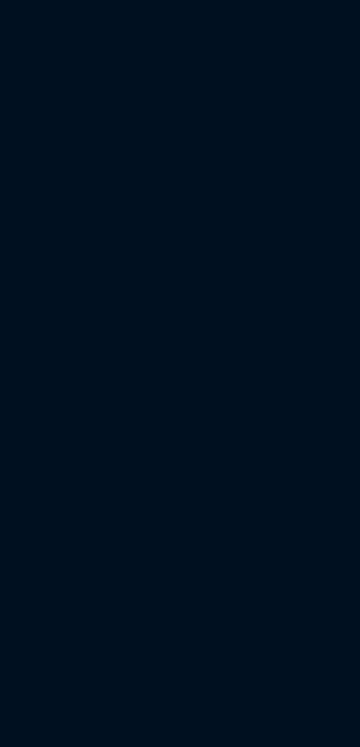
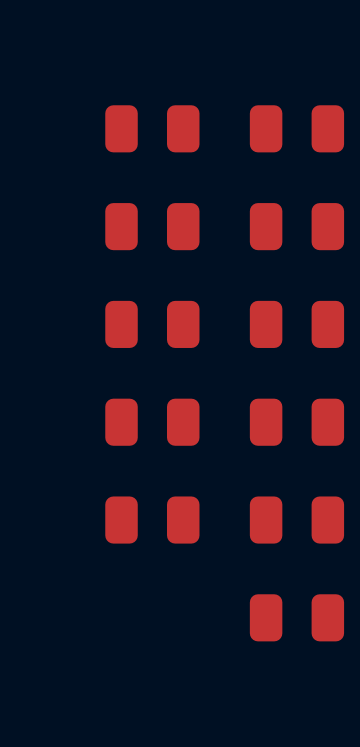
part: none -> (152, 128)
part: none -> (296, 128)
part: none -> (152, 226)
part: none -> (296, 226)
part: none -> (152, 324)
part: none -> (296, 324)
part: none -> (152, 422)
part: none -> (296, 422)
part: none -> (152, 520)
part: none -> (296, 520)
part: none -> (296, 617)

